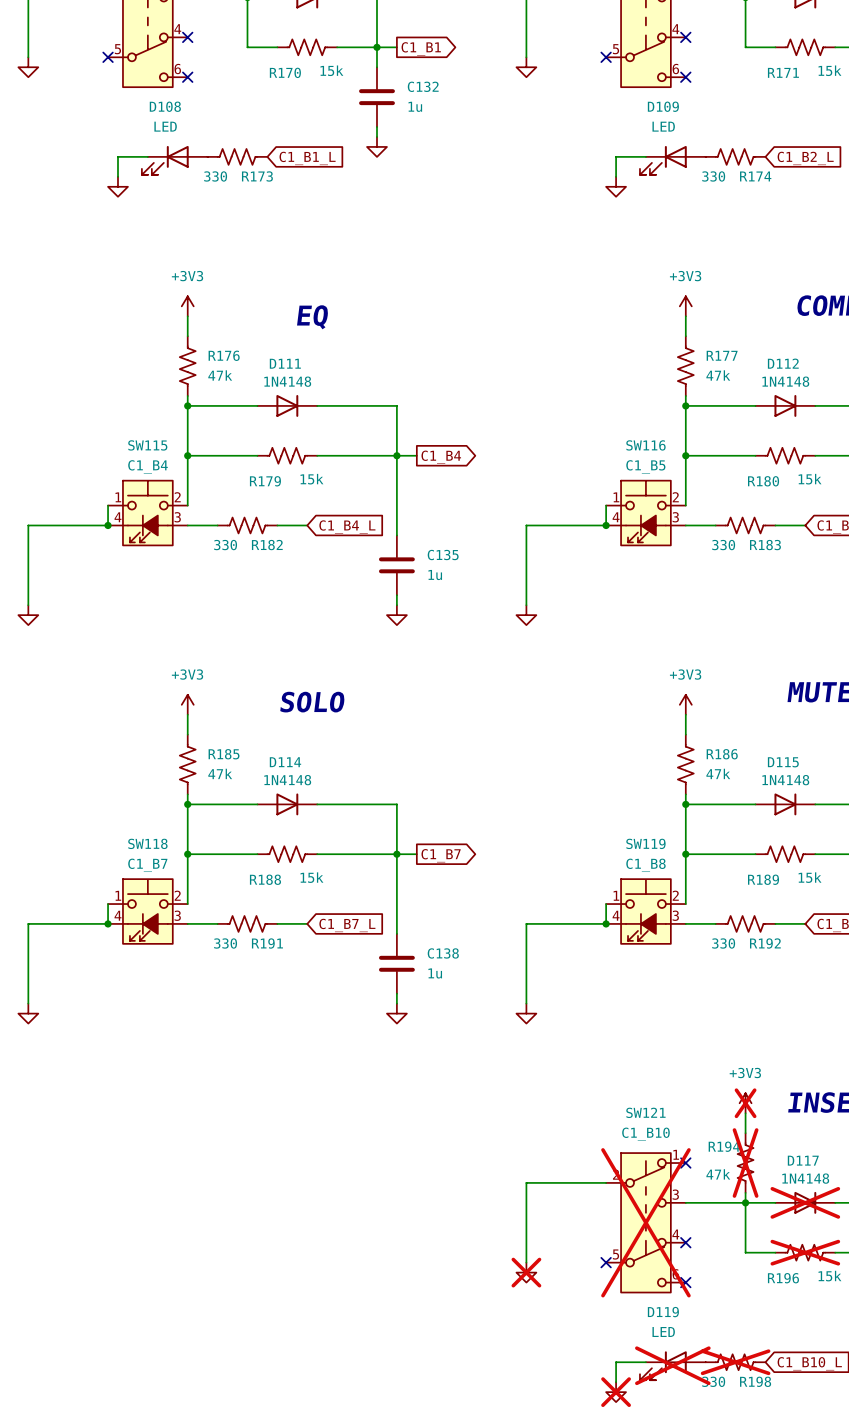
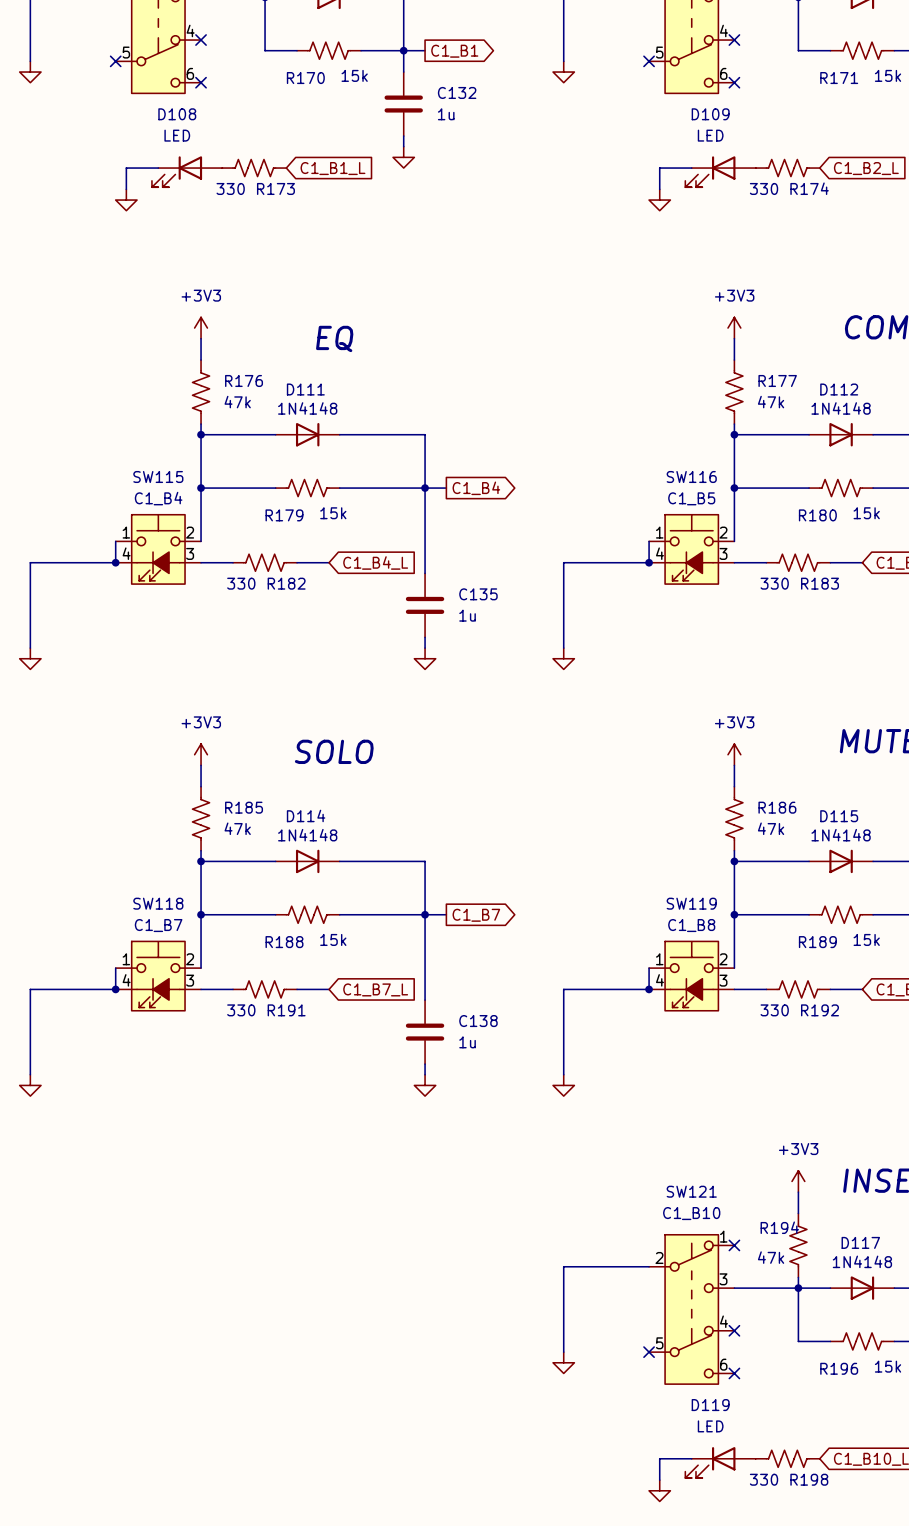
power symbol do-not-place cross: (745, 1103) -> none
R194 do-not-place cross: (745, 1163) -> none
D117 do-not-place cross: (805, 1202) -> none
SW121 do-not-place cross: (645, 1222) -> none
R196 do-not-place cross: (805, 1252) -> none
power symbol do-not-place cross: (526, 1272) -> none
R198 do-not-place cross: (735, 1362) -> none
D119 do-not-place cross: (672, 1365) -> none
power symbol do-not-place cross: (616, 1392) -> none

